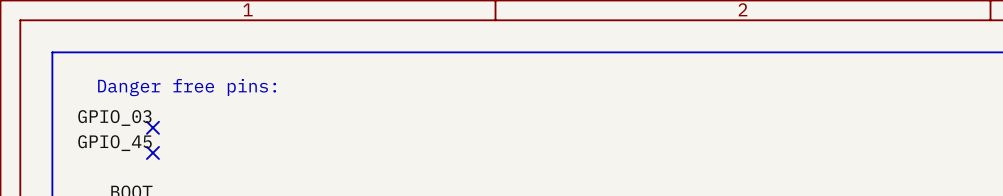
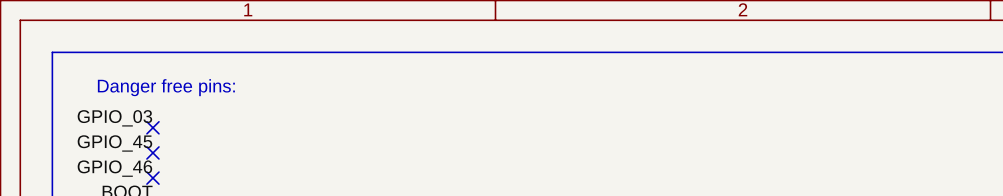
label: none -> GPIO_46 (114, 168)
no-connect mark: none -> (152, 178)

